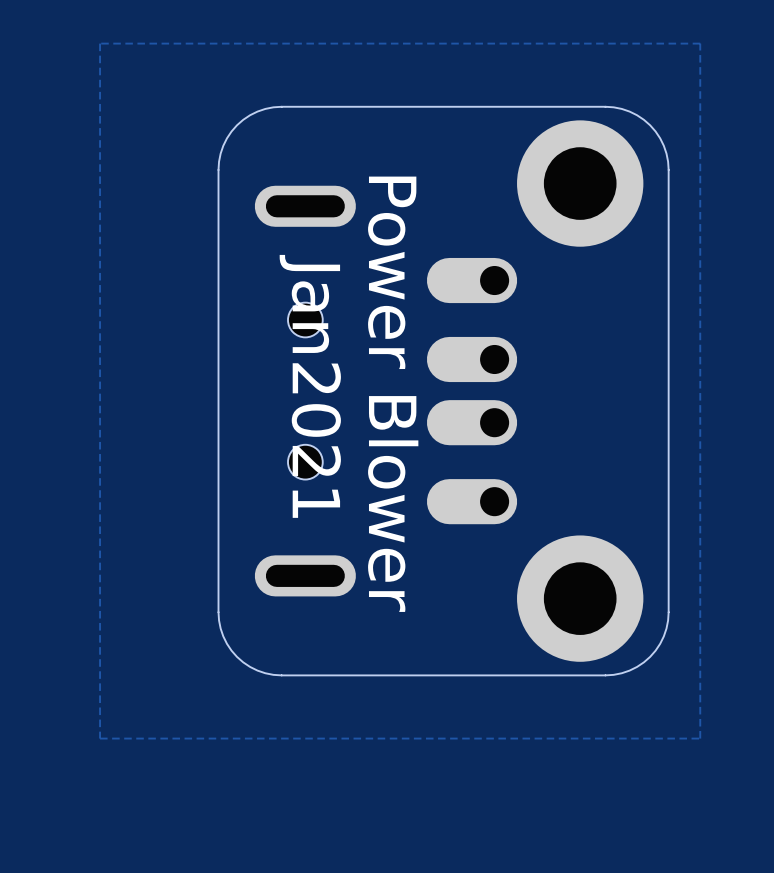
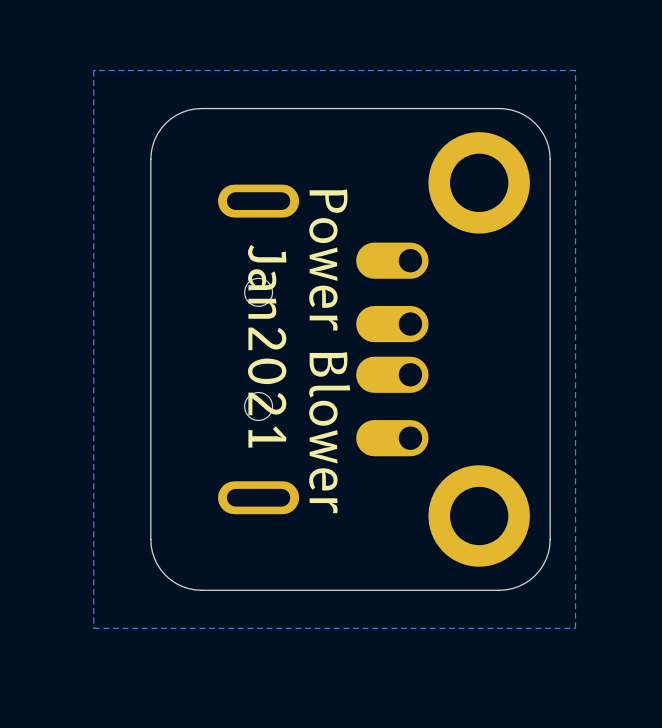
board edge: (668, 169) (663, 145) (650, 125) (629, 111) (605, 106) (273, 107) (250, 115) (237, 125) (223, 145) (218, 169) (218, 612) (223, 636) (237, 656) (257, 670) (281, 675) (613, 674) (637, 666) (650, 656) (663, 636) (668, 612) -> (550, 171) (548, 146) (539, 128) (524, 115) (512, 110) (499, 108) (194, 108) (176, 115) (165, 123) (154, 139) (150, 159) (150, 539) (154, 558) (165, 575) (182, 586) (201, 590) (506, 589) (524, 583) (539, 570) (548, 552) (550, 526)

